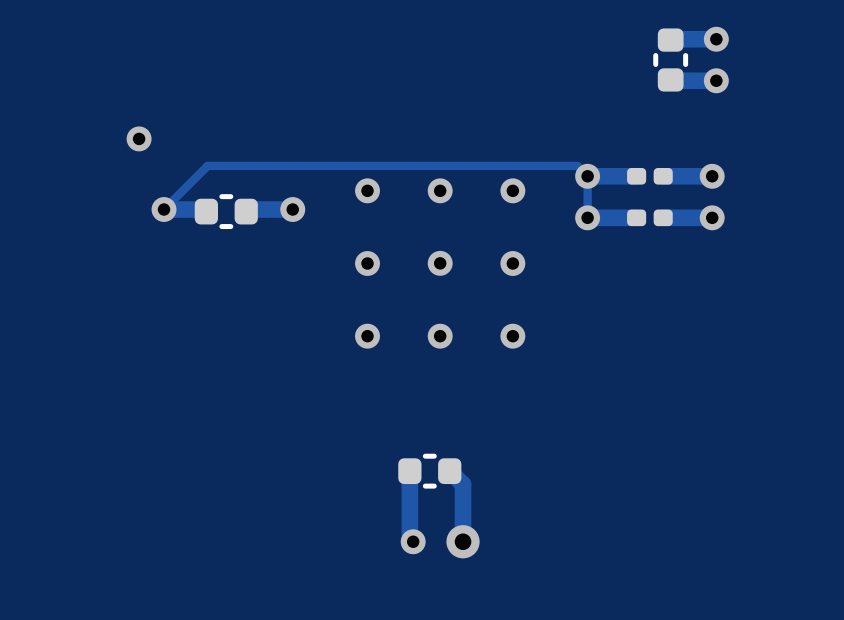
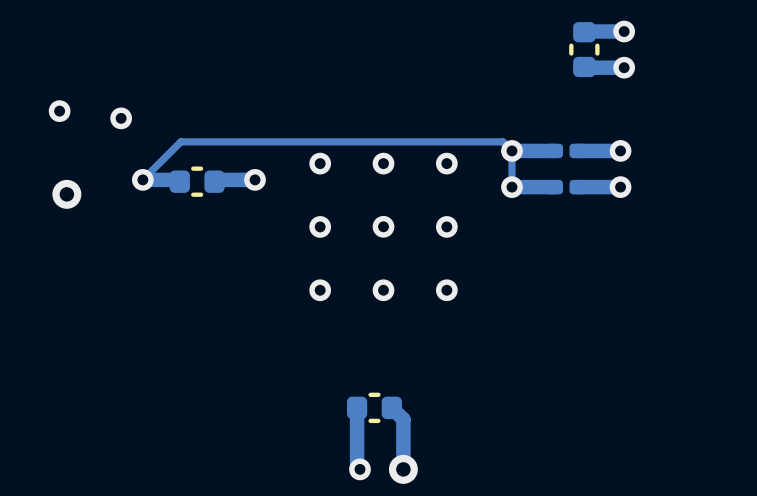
via: none -> (59, 111)
via: none -> (66, 194)

